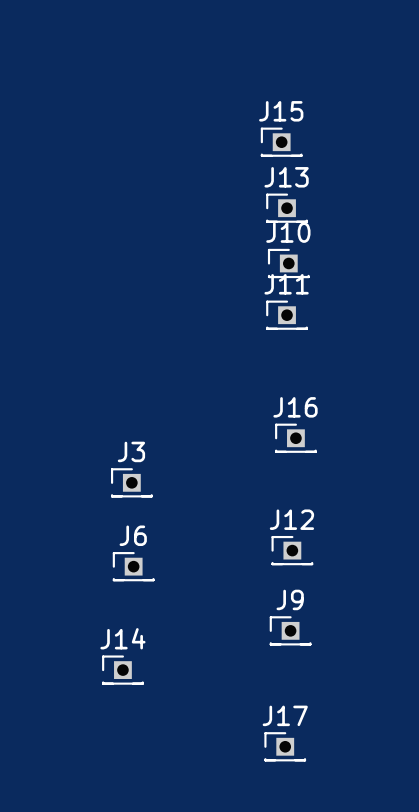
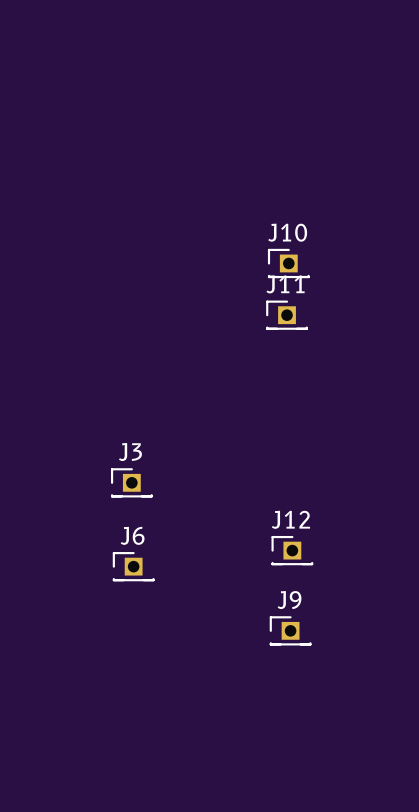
J15: (281, 142) -> none
J13: (287, 208) -> none
J16: (295, 438) -> none
J14: (122, 670) -> none
J17: (285, 746) -> none

